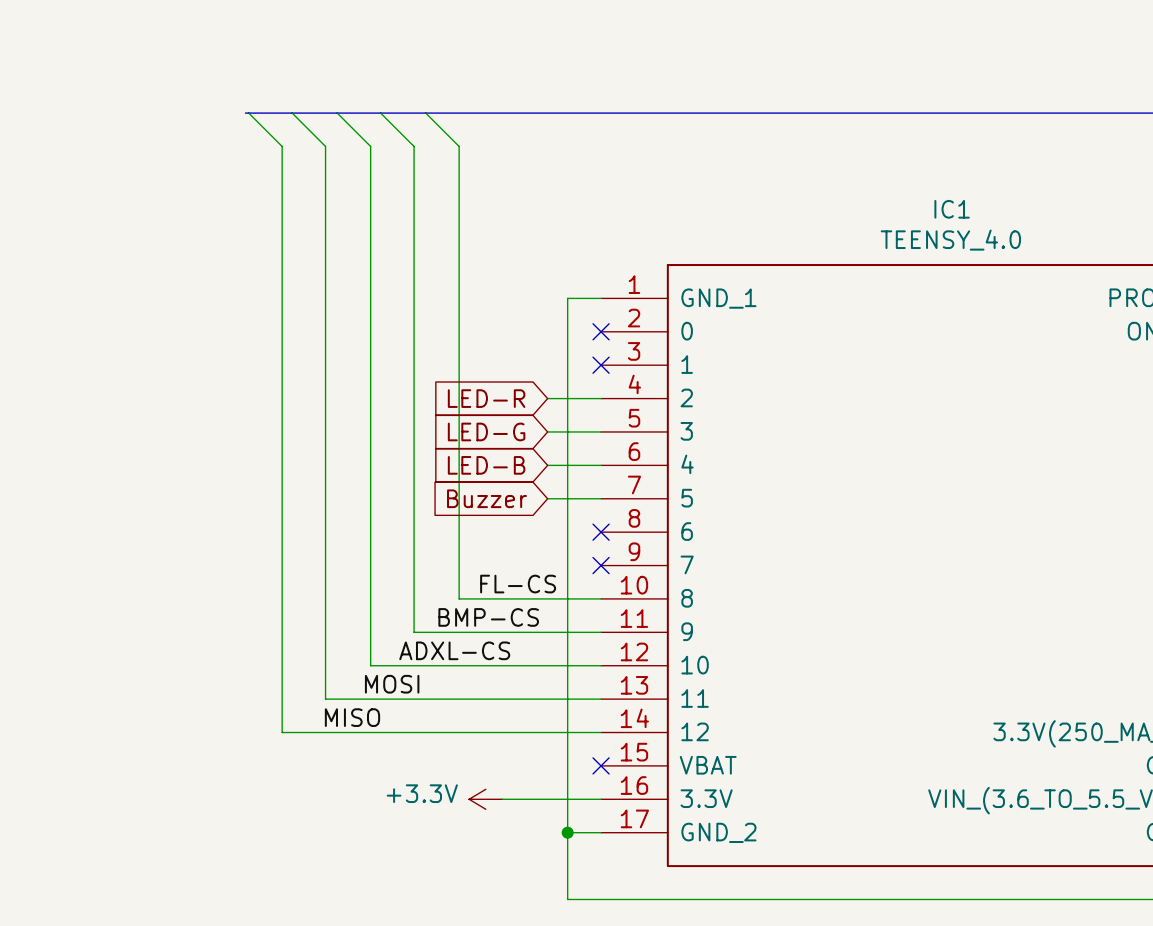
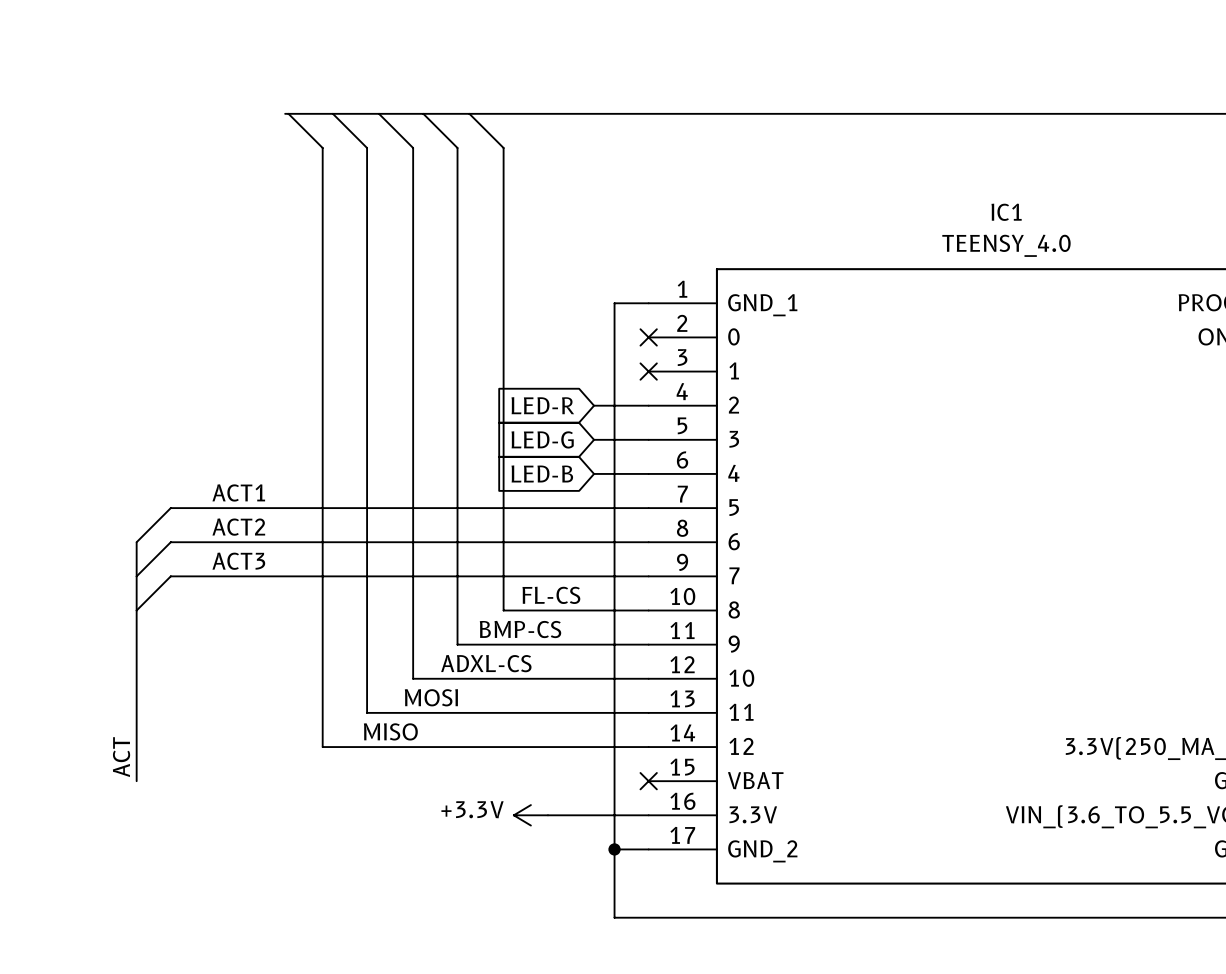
label: none -> ACT1 (238, 492)
global label: Buzzer (486, 498) -> none
wire: none -> (594, 508) (170, 508) (136, 542)
label: none -> ACT2 (238, 527)
bus: none -> (136, 542) (136, 781)
wire: none -> (648, 542) (170, 542) (136, 576)
no-connect mark: (601, 532) -> none
label: none -> ACT3 (238, 561)
wire: none -> (648, 576) (170, 576) (136, 610)
no-connect mark: (601, 565) -> none
label: none -> ACT (121, 757)

